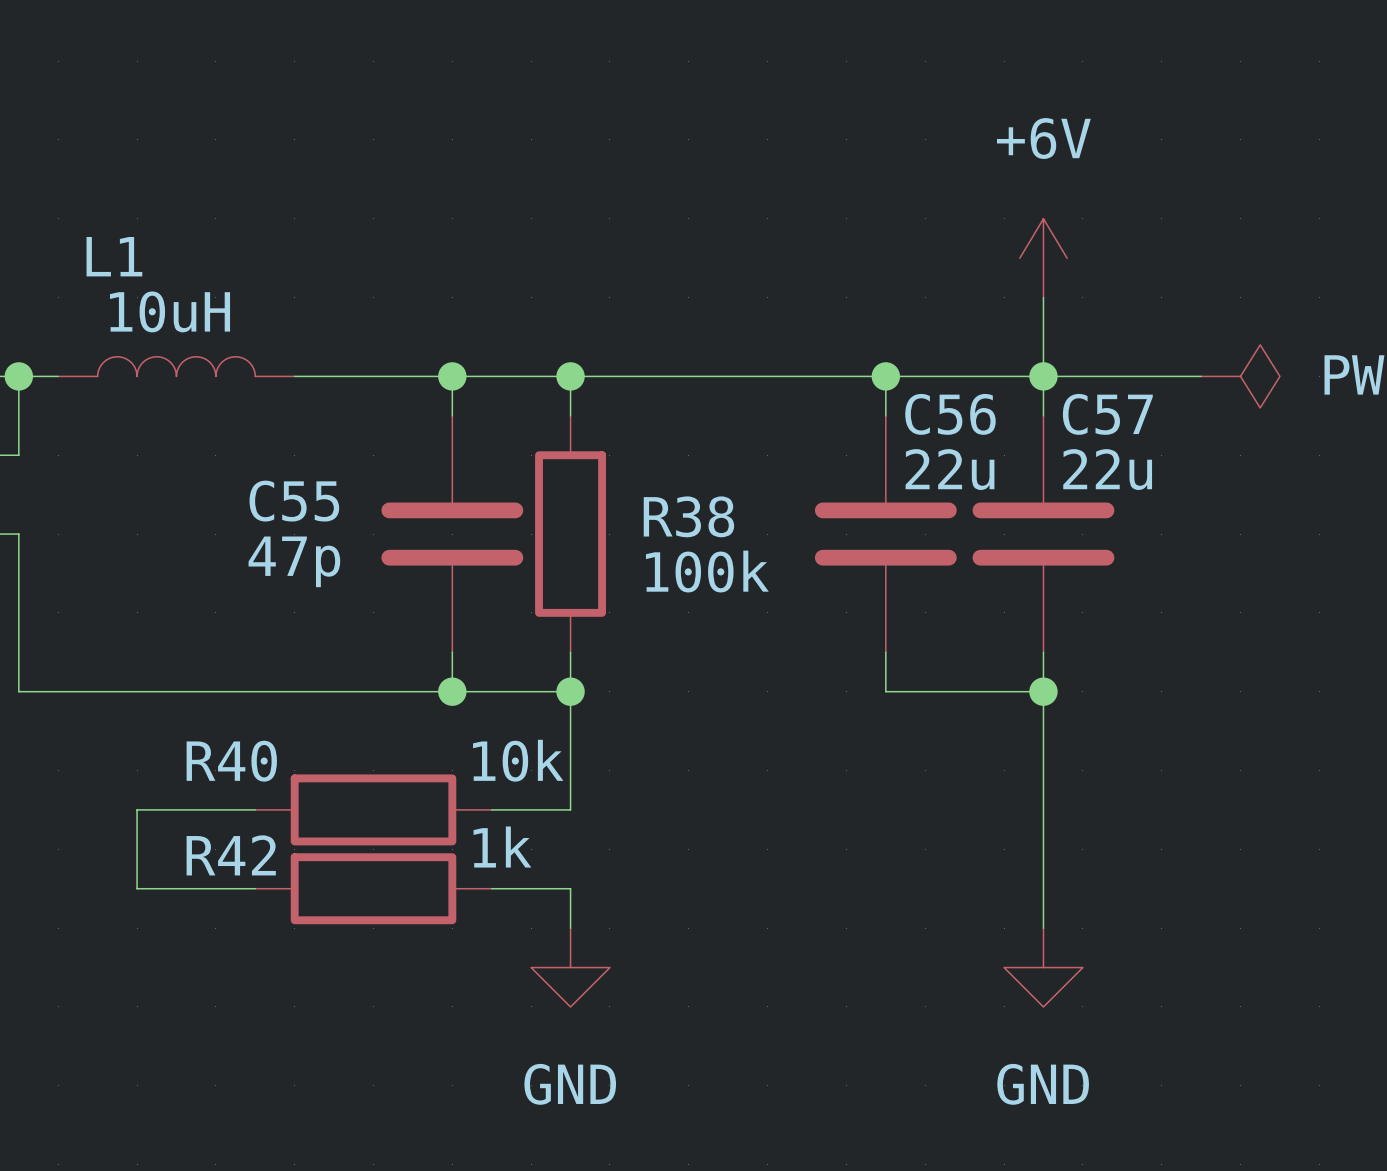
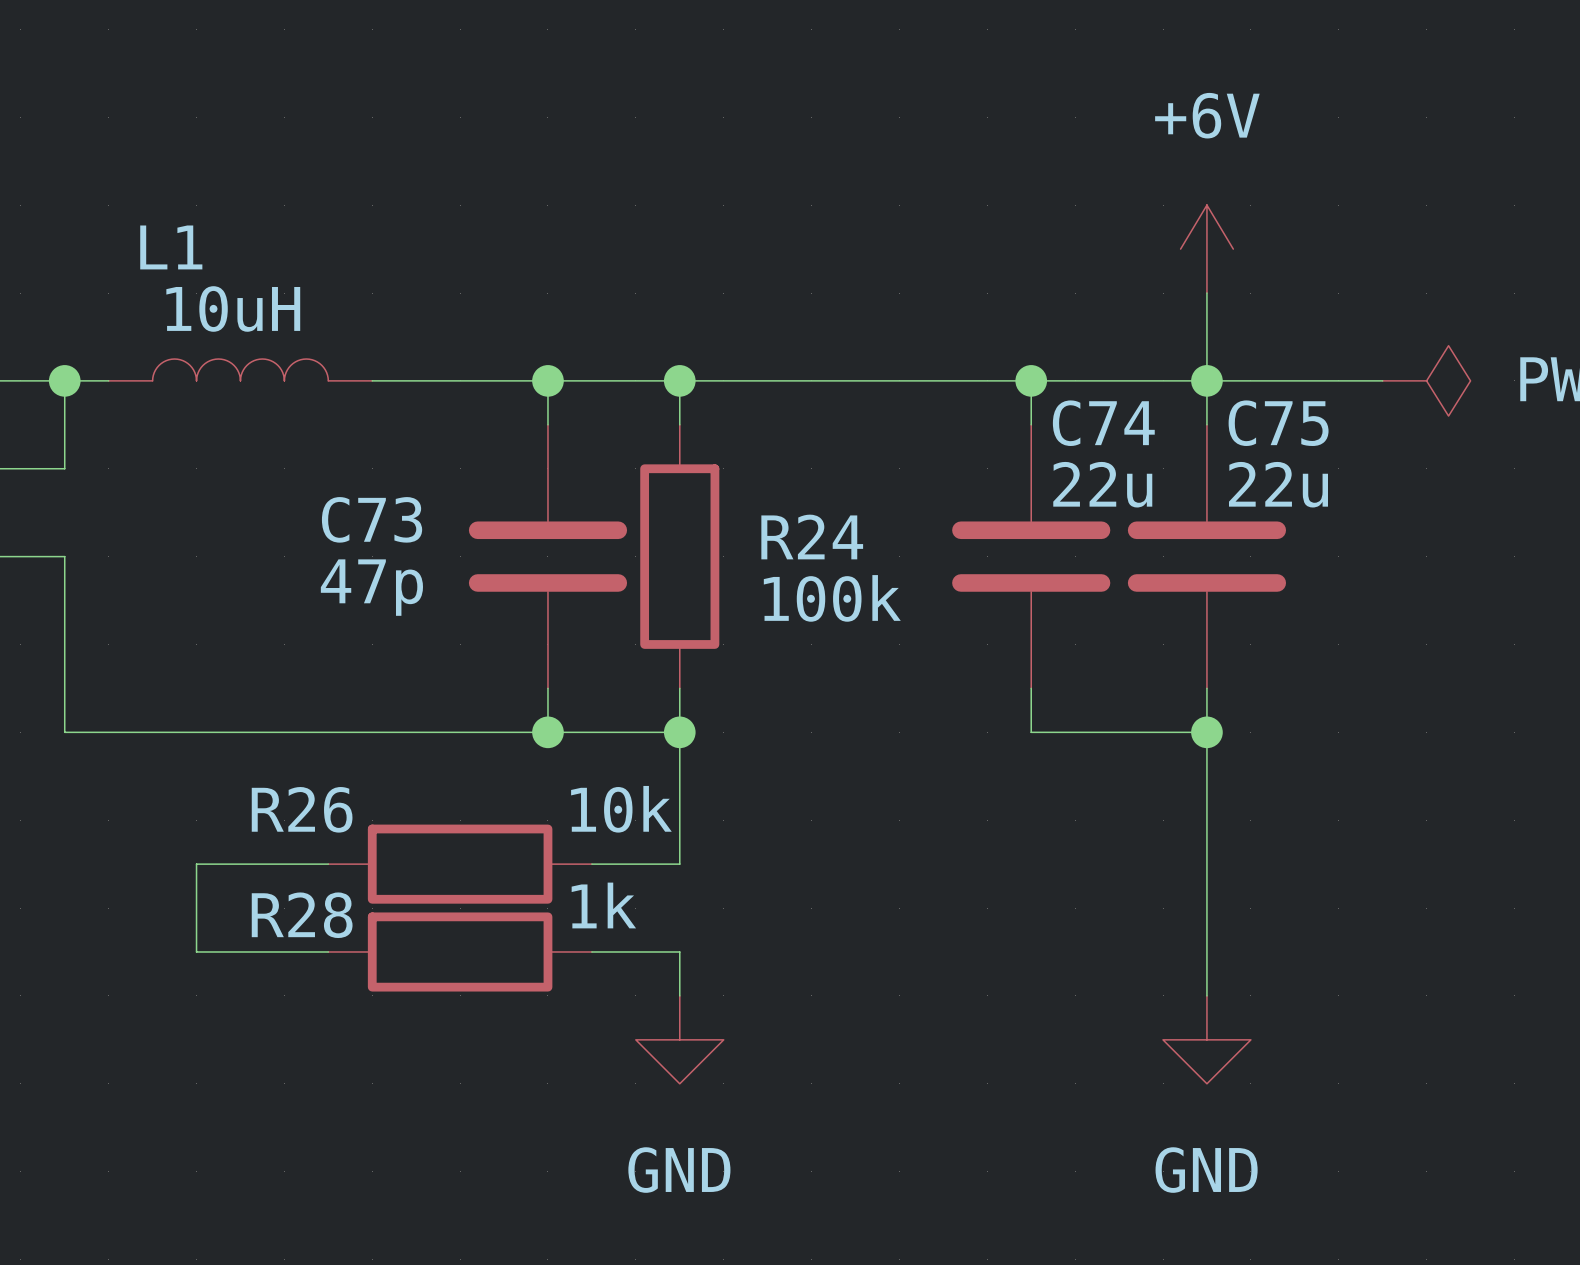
C56 name: C56 (950, 414) -> C74 (1103, 423)
C57 name: C57 (1107, 414) -> C75 (1278, 423)
C55 name: C55 (294, 501) -> C73 (372, 519)
R38 name: R38 (688, 516) -> R24 (812, 537)
R40 name: R40 (231, 761) -> R26 (302, 809)
R42 name: R42 (231, 855) -> R28 (302, 915)

